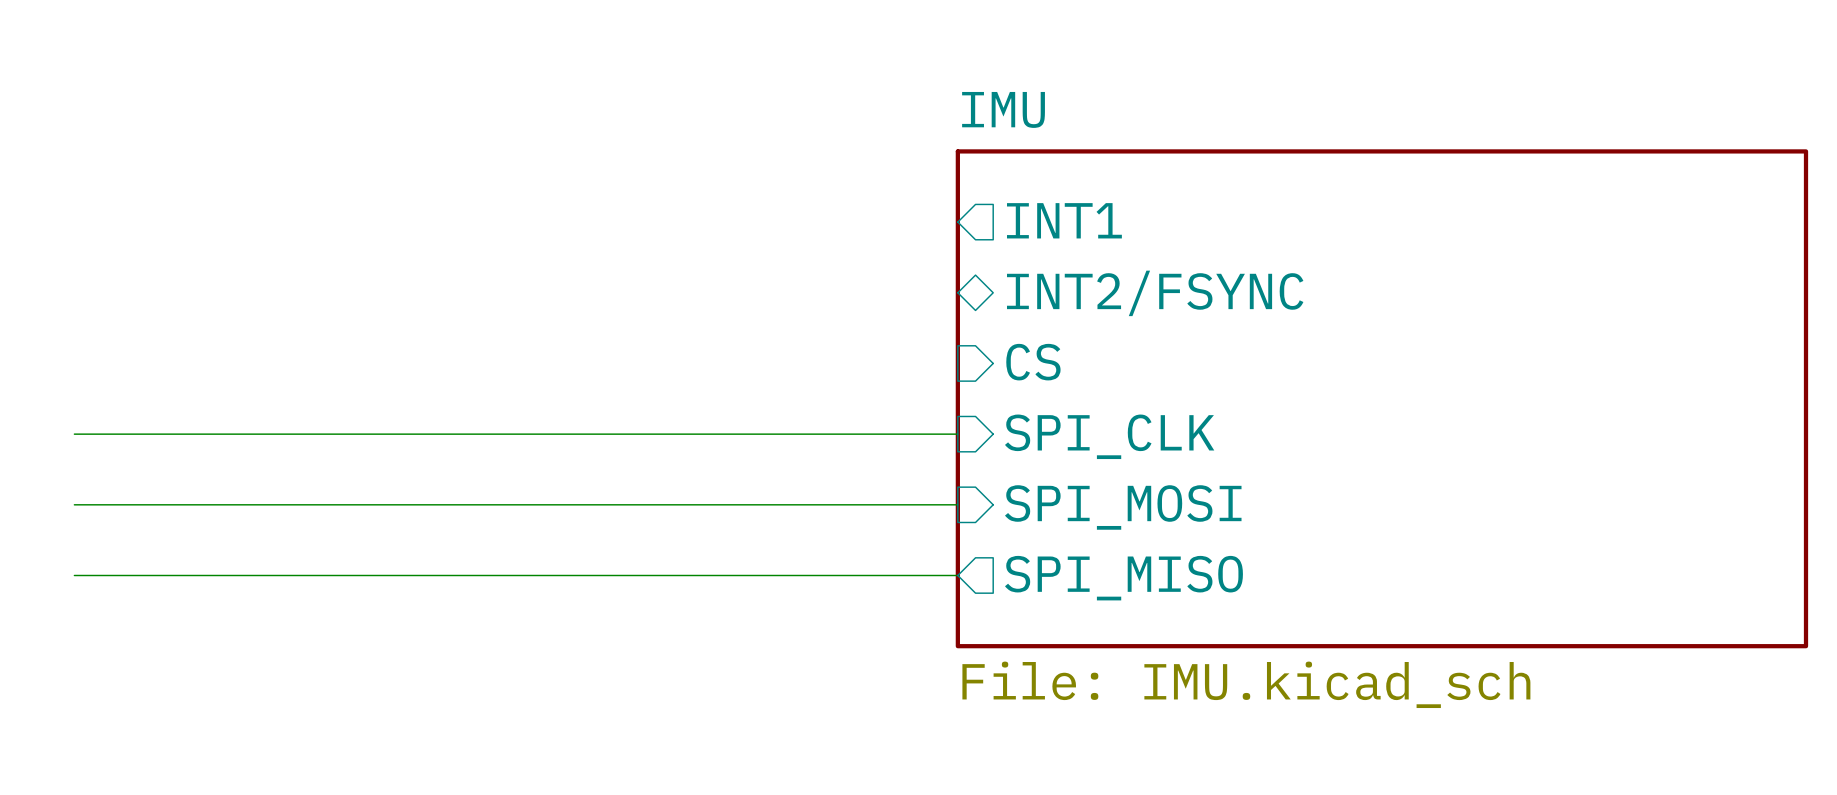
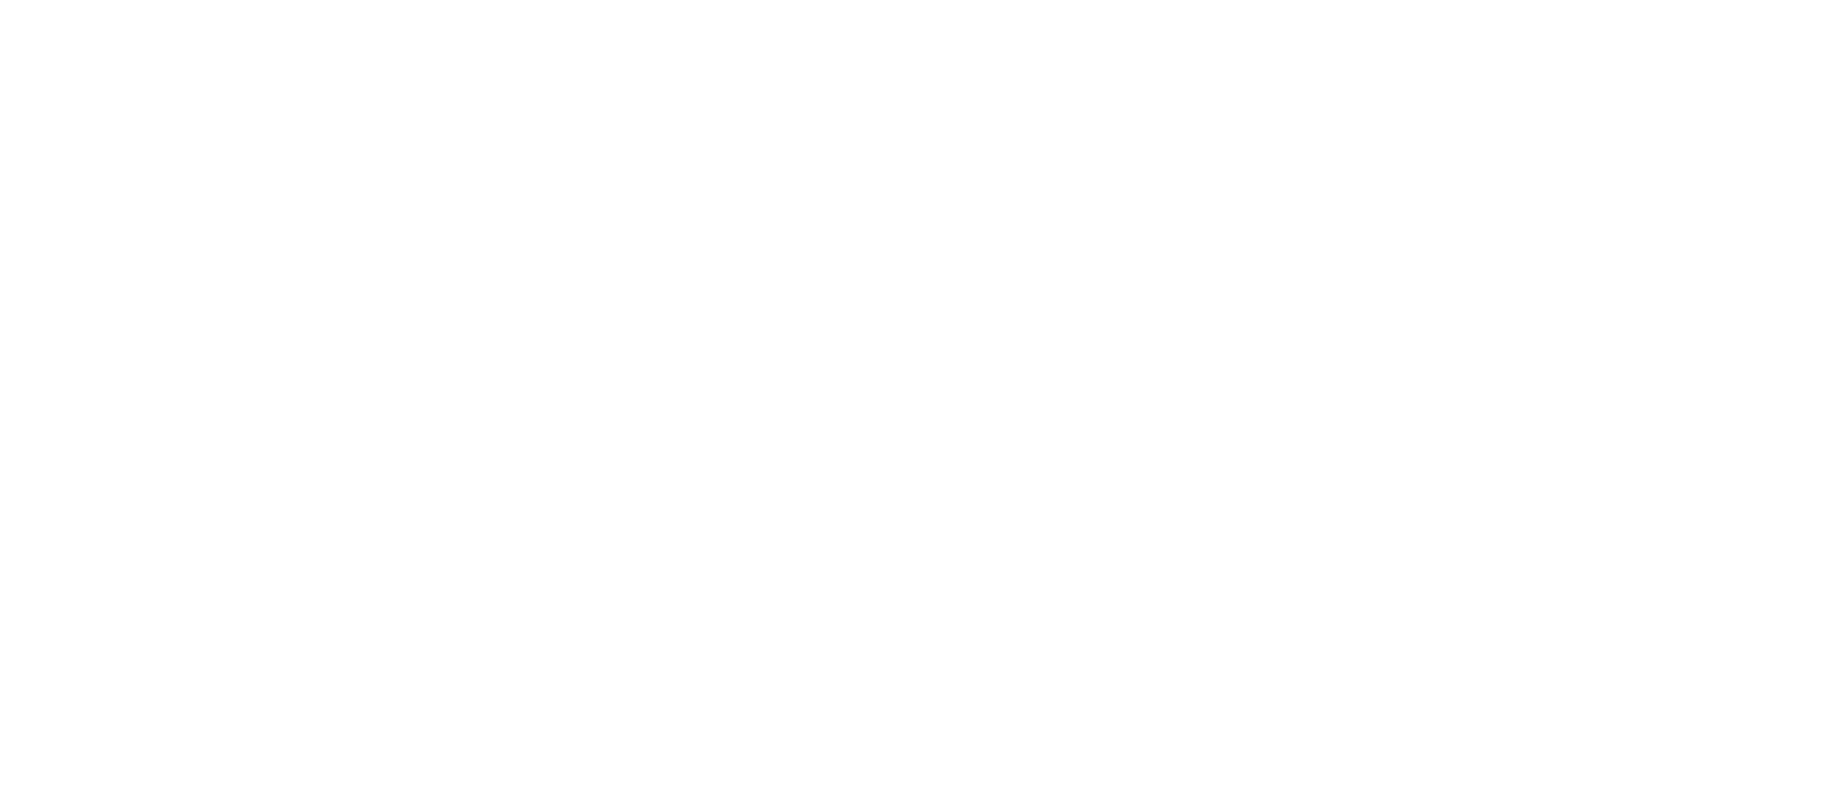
sheet pin: INT1 (1064, 220) -> none
sheet pin: INT2/FSYNC (1155, 293) -> none
sheet pin: CS (1033, 362) -> none
sheet IMU: File: IMU.kicad_sch (1381, 398) -> none
wire: (74, 434) (957, 434) -> none
sheet pin: SPI_CLK (1109, 436) -> none
wire: (74, 504) (957, 504) -> none
sheet pin: SPI_MOSI (1123, 507) -> none
wire: (74, 575) (957, 575) -> none
sheet pin: SPI_MISO (1123, 578) -> none

